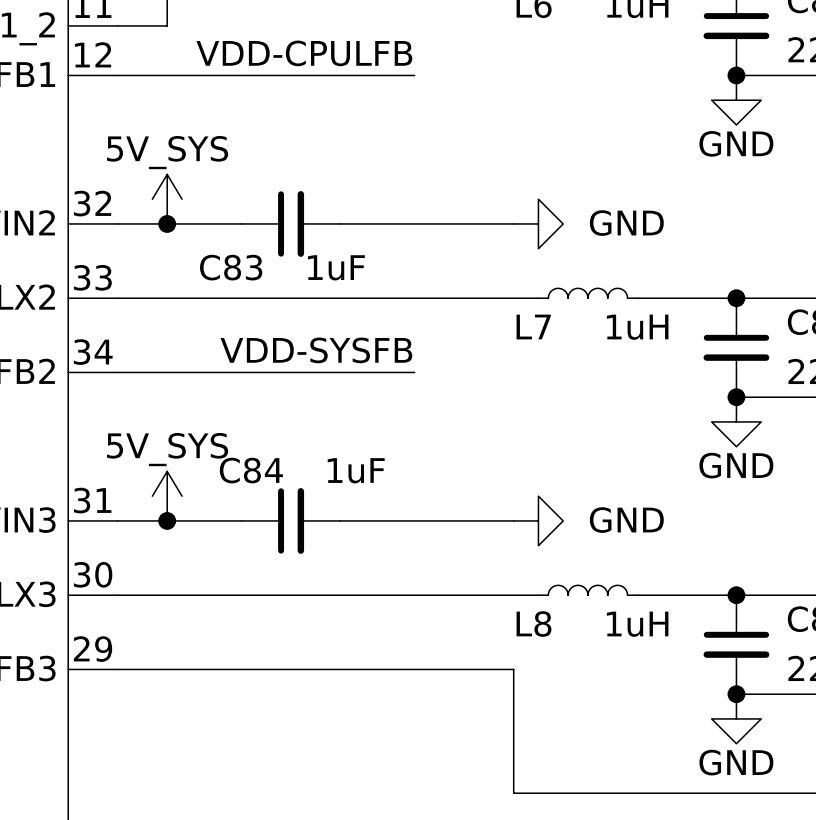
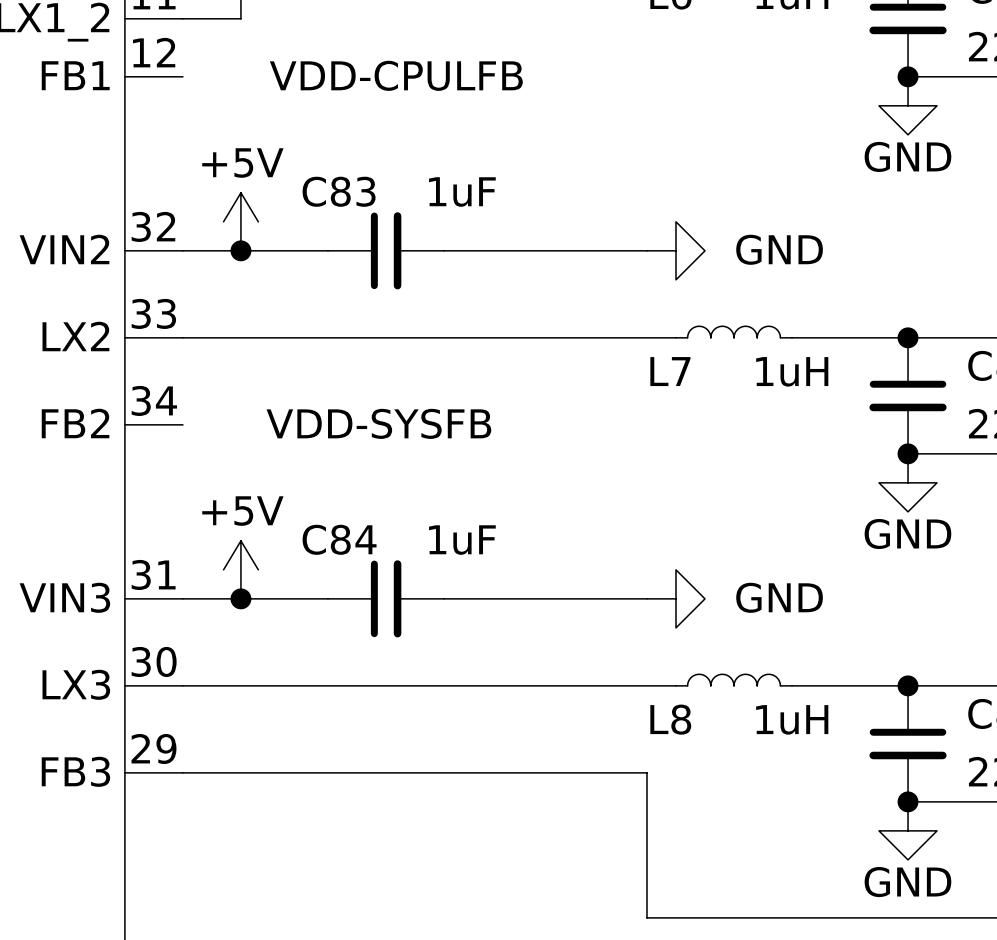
label: VDD-CPULFB (304, 53) -> none
text: none -> VDD-CPULFB (396, 75)
wire: (117, 75) (414, 75) -> none
power symbol: 5V_SYS (167, 199) -> +5V (240, 221)
C83 name position: C83 (231, 267) -> C83 (339, 191)
C83 value position: 1uF (336, 267) -> 1uF (462, 192)
label: VDD-SYSFB (316, 350) -> none
text: none -> VDD-SYSFB (378, 423)
wire: (117, 372) (414, 372) -> none
power symbol: 5V_SYS (167, 496) -> +5V (240, 569)

